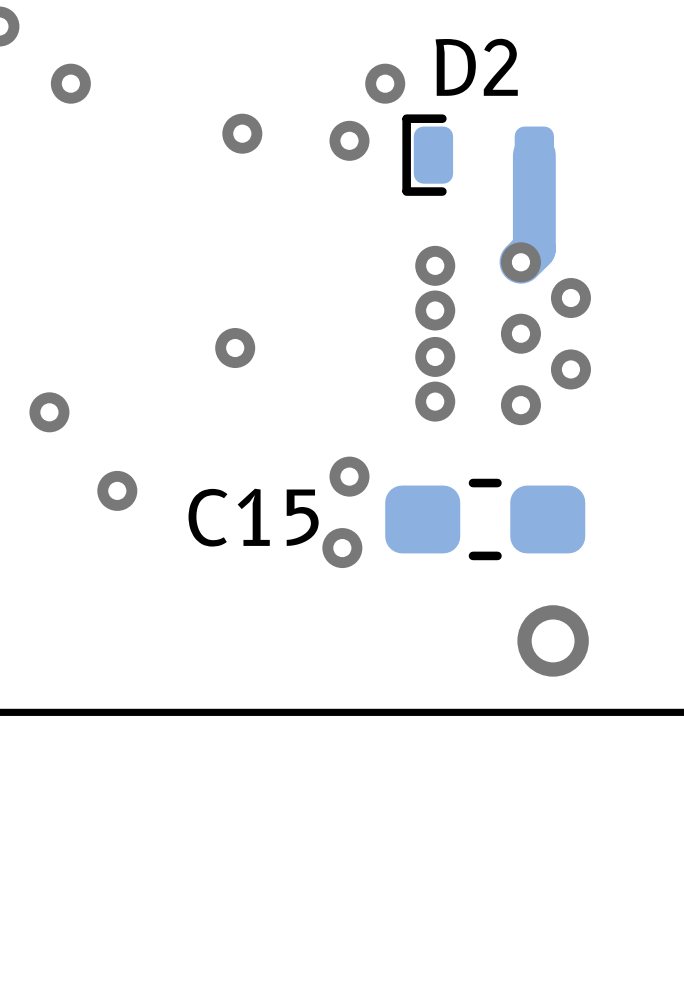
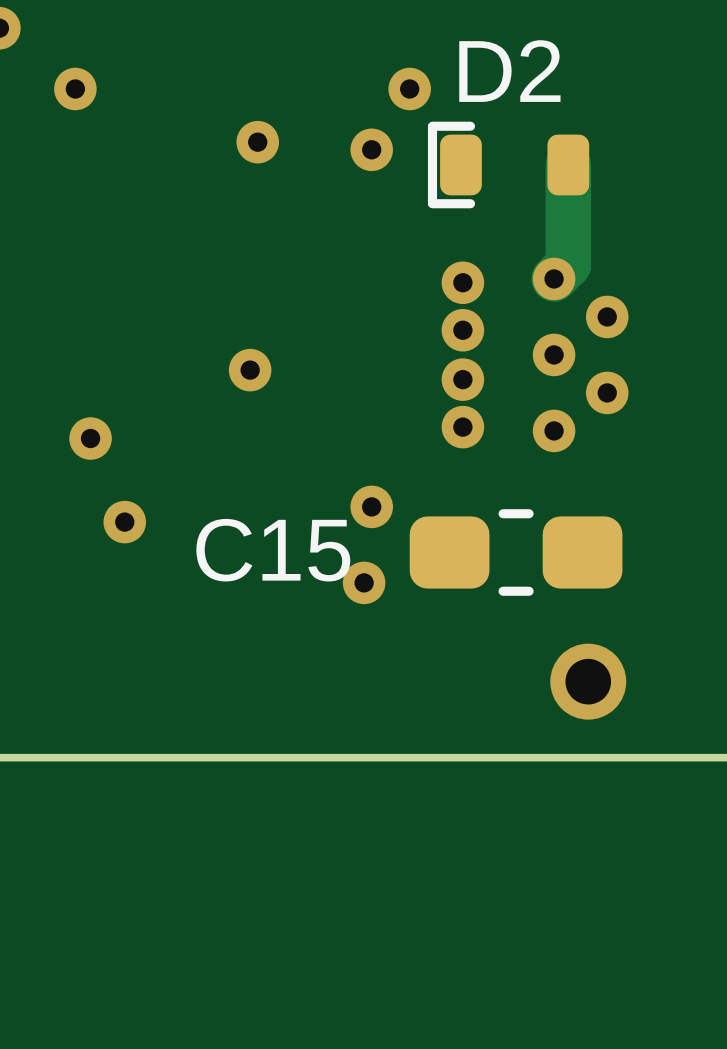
via position: (49, 412) -> (90, 438)

